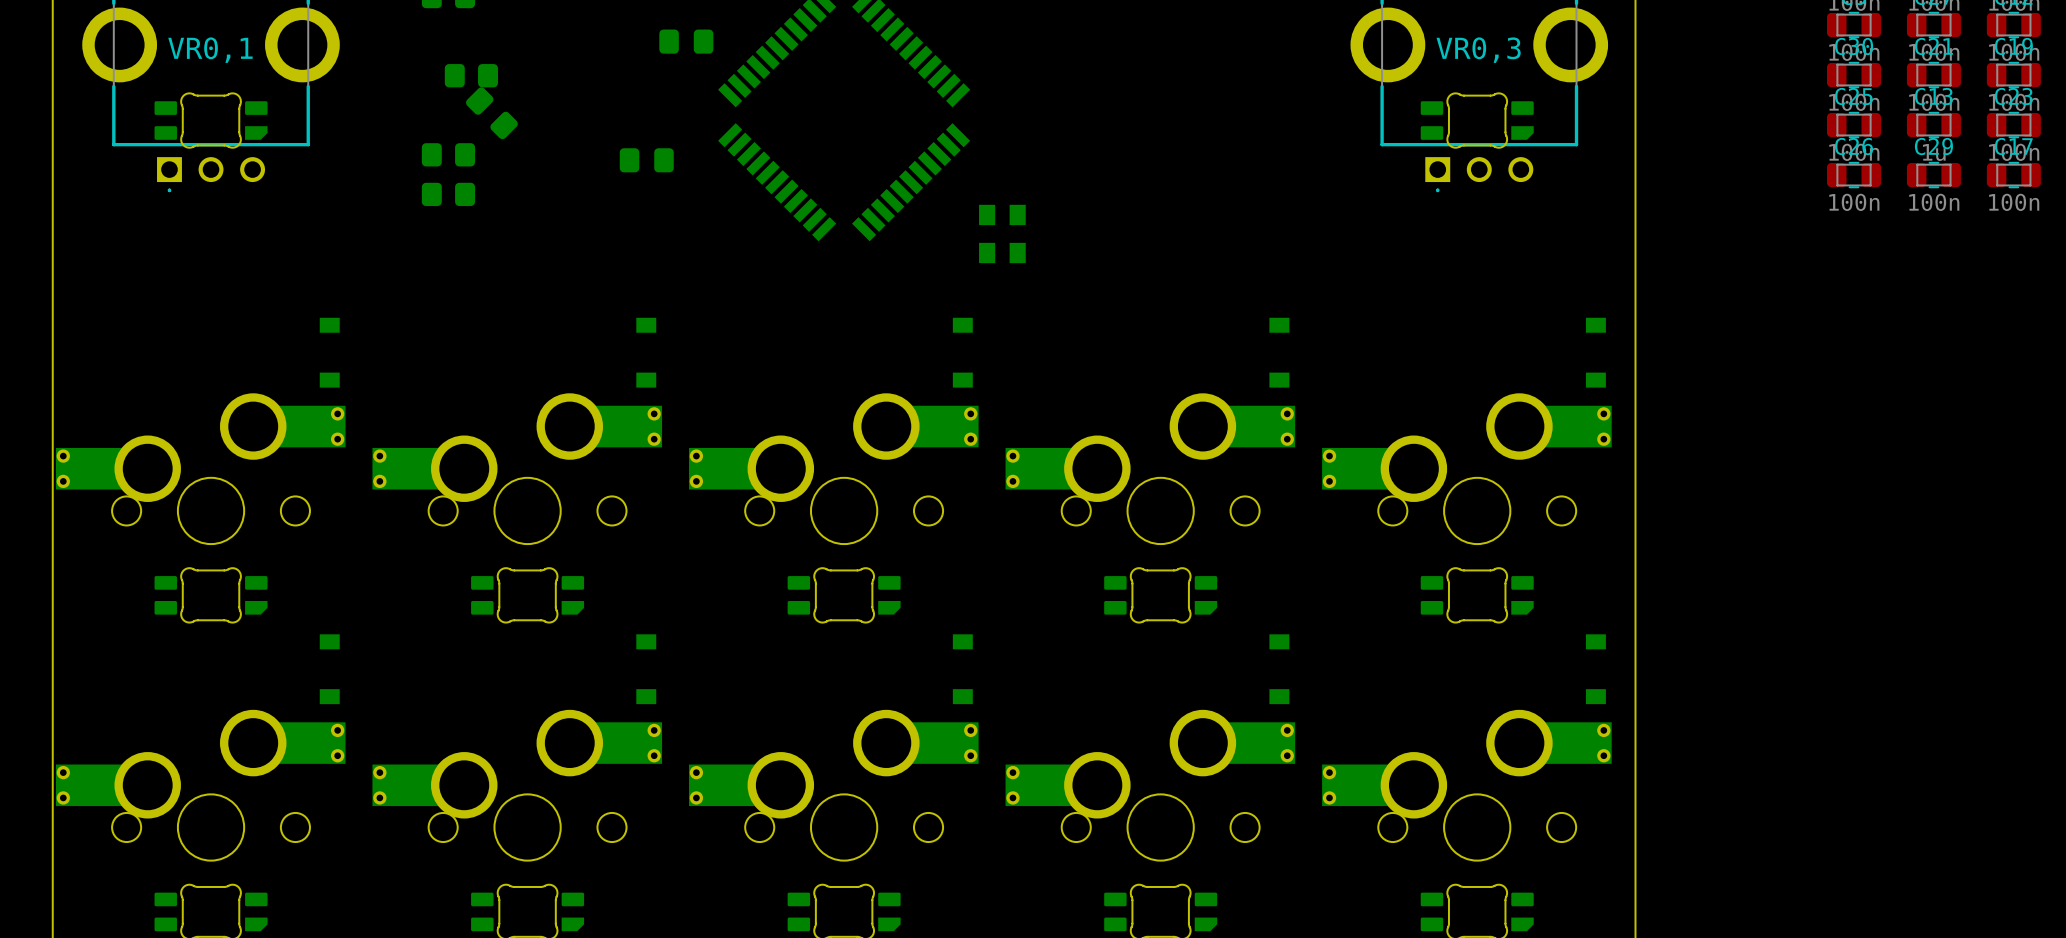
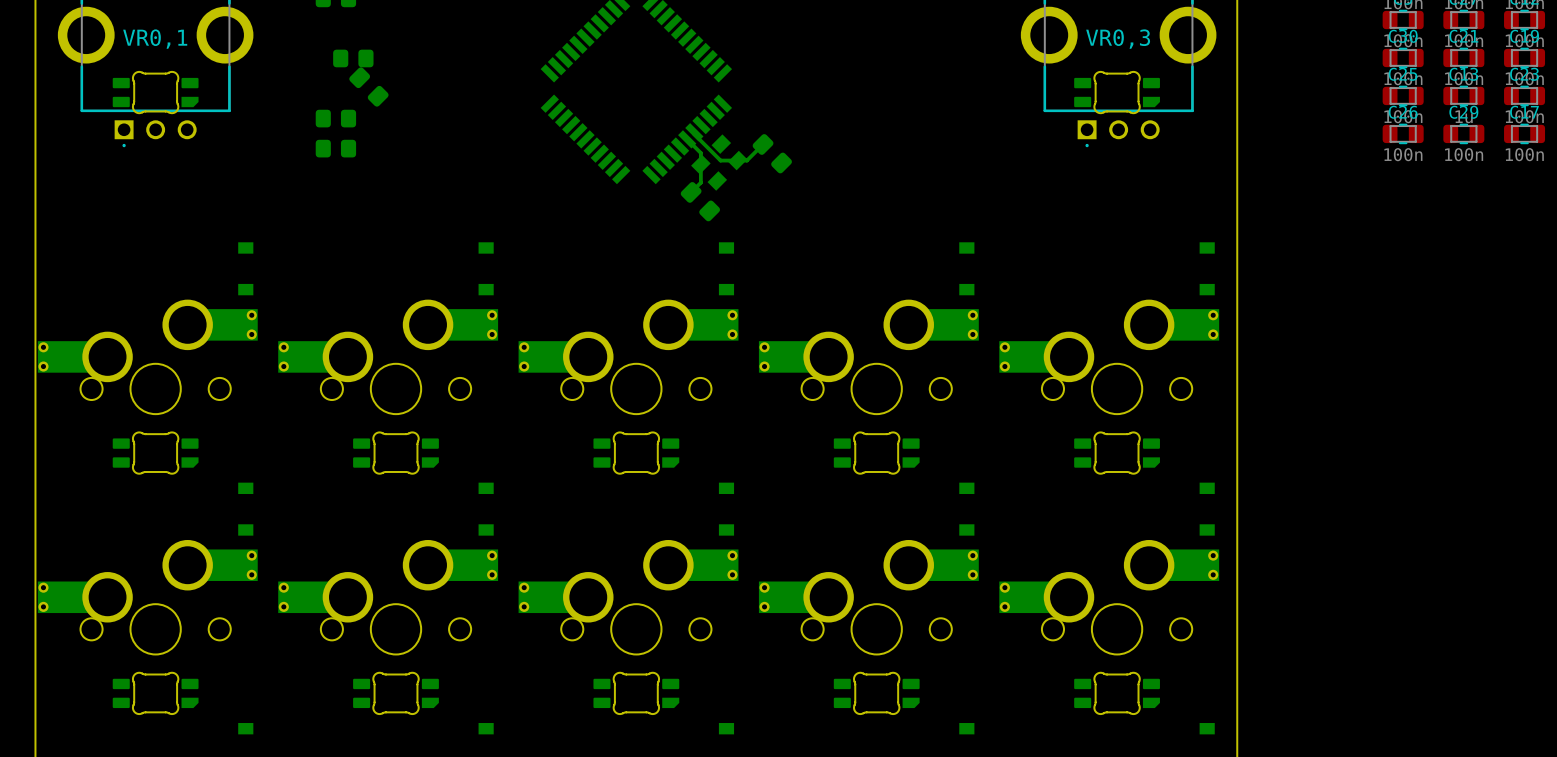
part: (686, 41) -> none
part: (646, 160) -> none
bottom track: none -> (694, 132) (720, 160) (746, 160) (763, 144)
bottom track: none -> (687, 139) (700, 153) (700, 182) (691, 192)
part: none -> (772, 153)
part: none -> (719, 162)
part: (1002, 233) -> none
part: none -> (700, 201)

